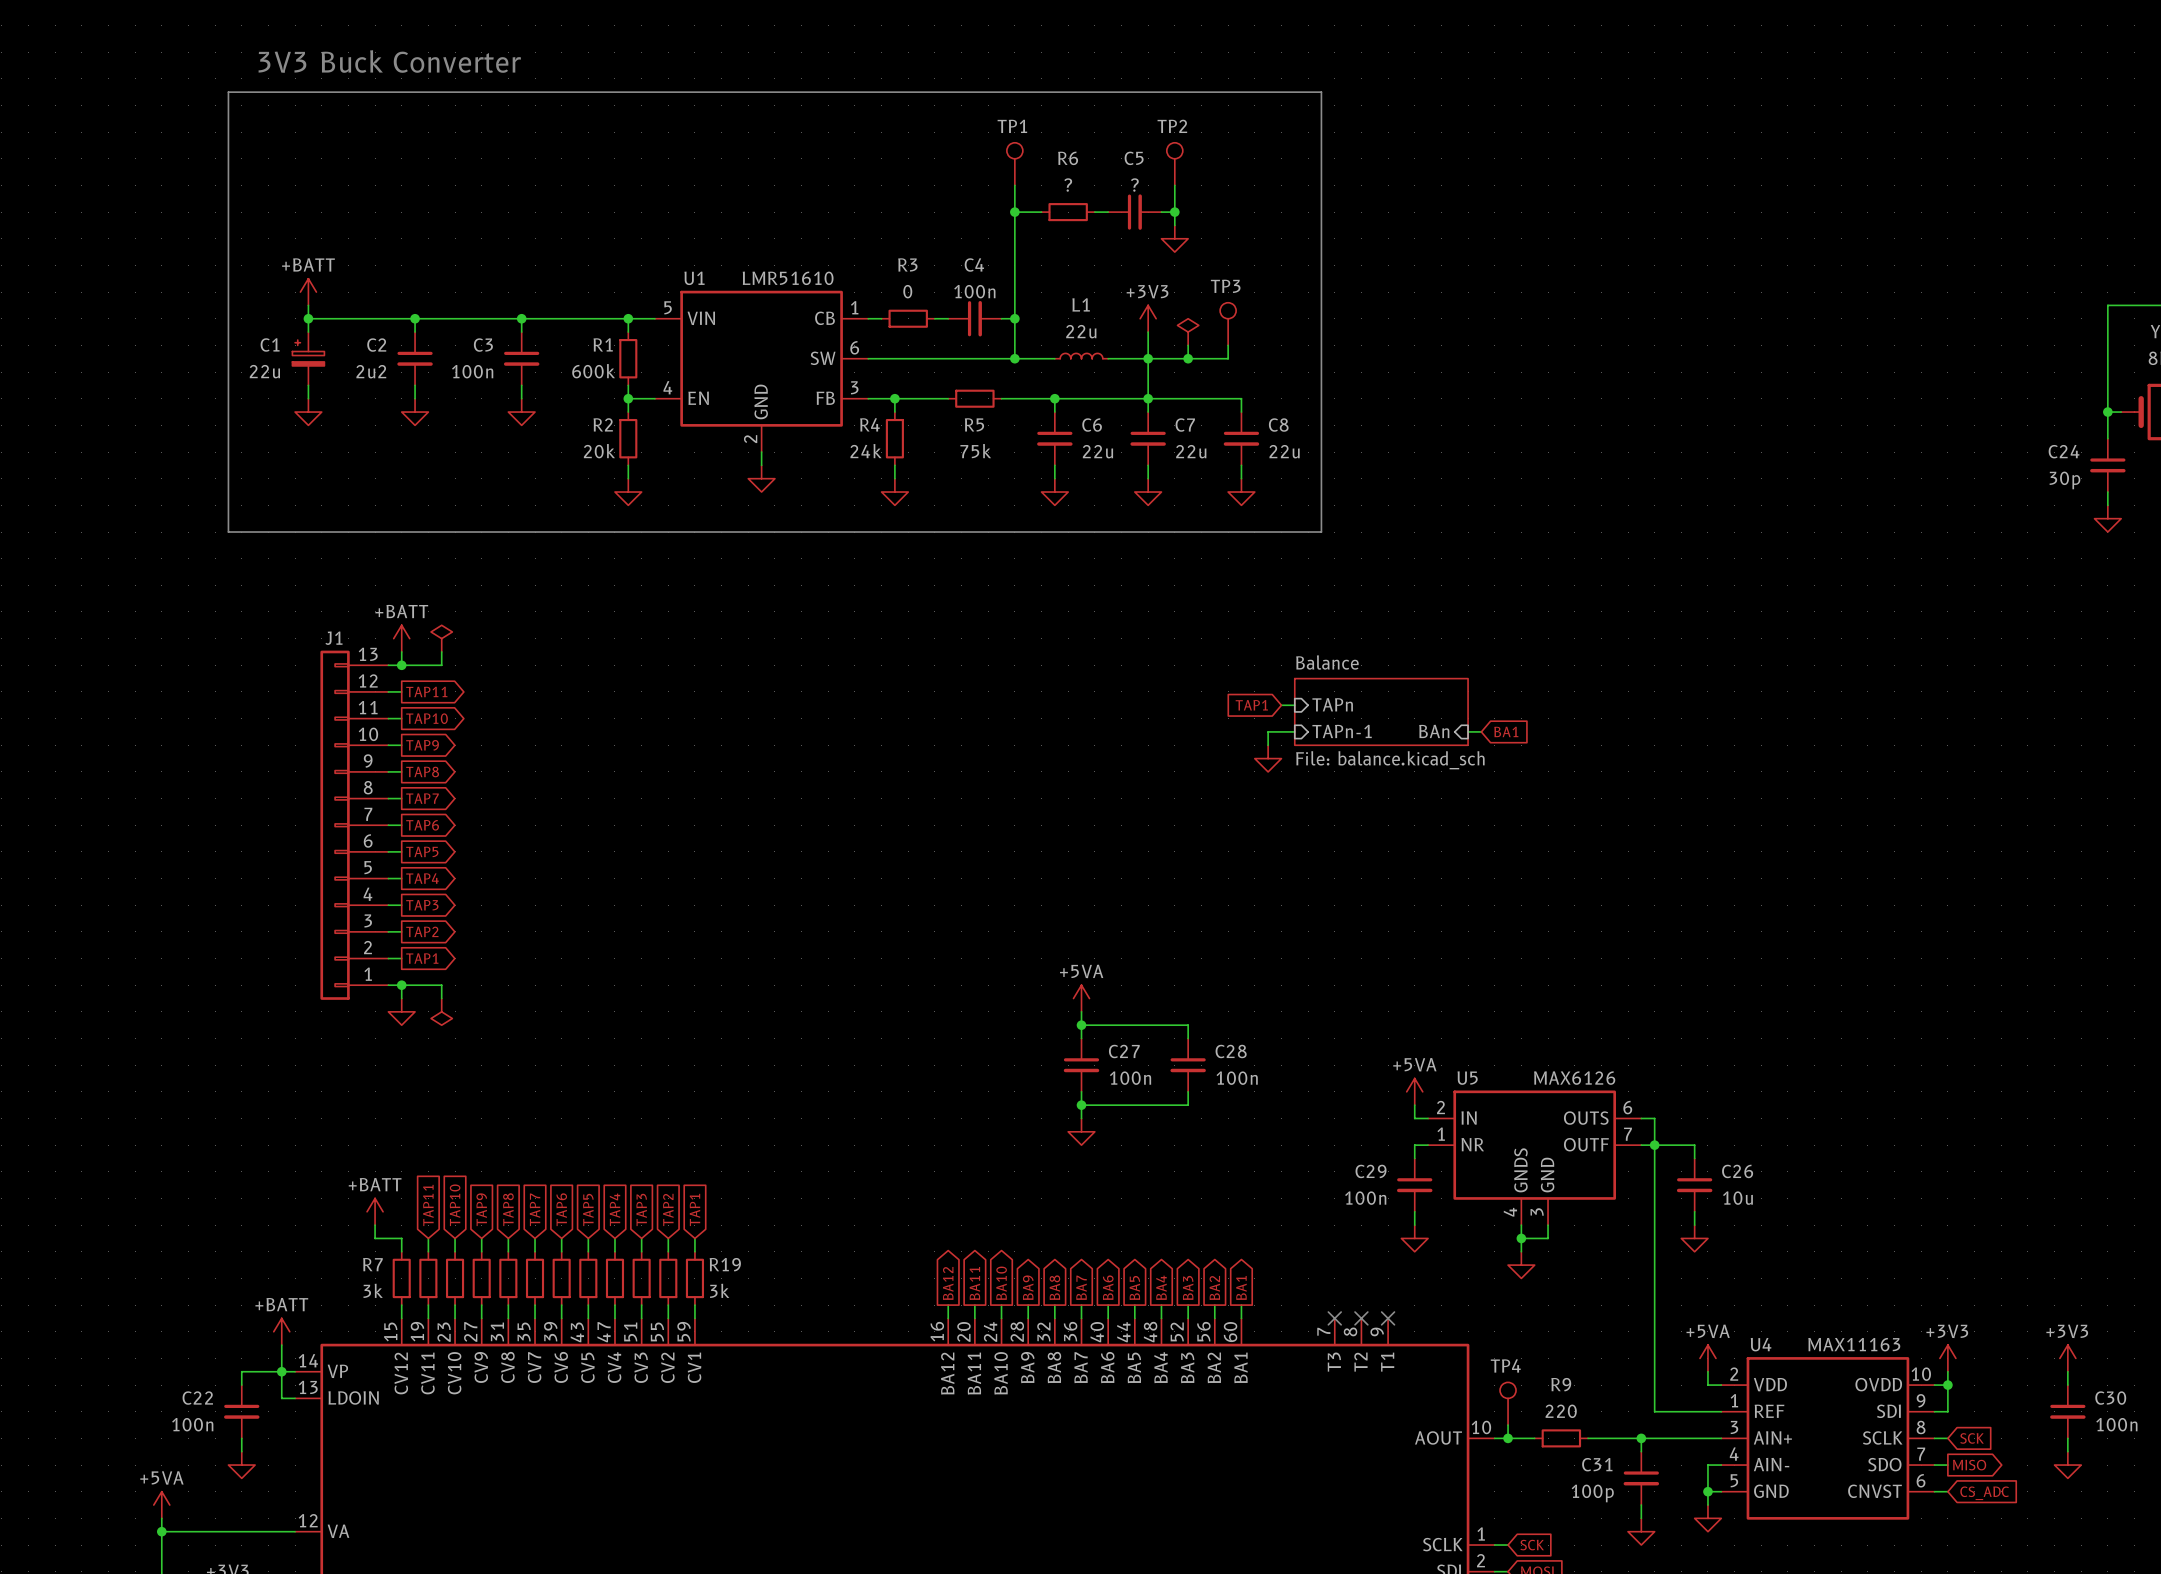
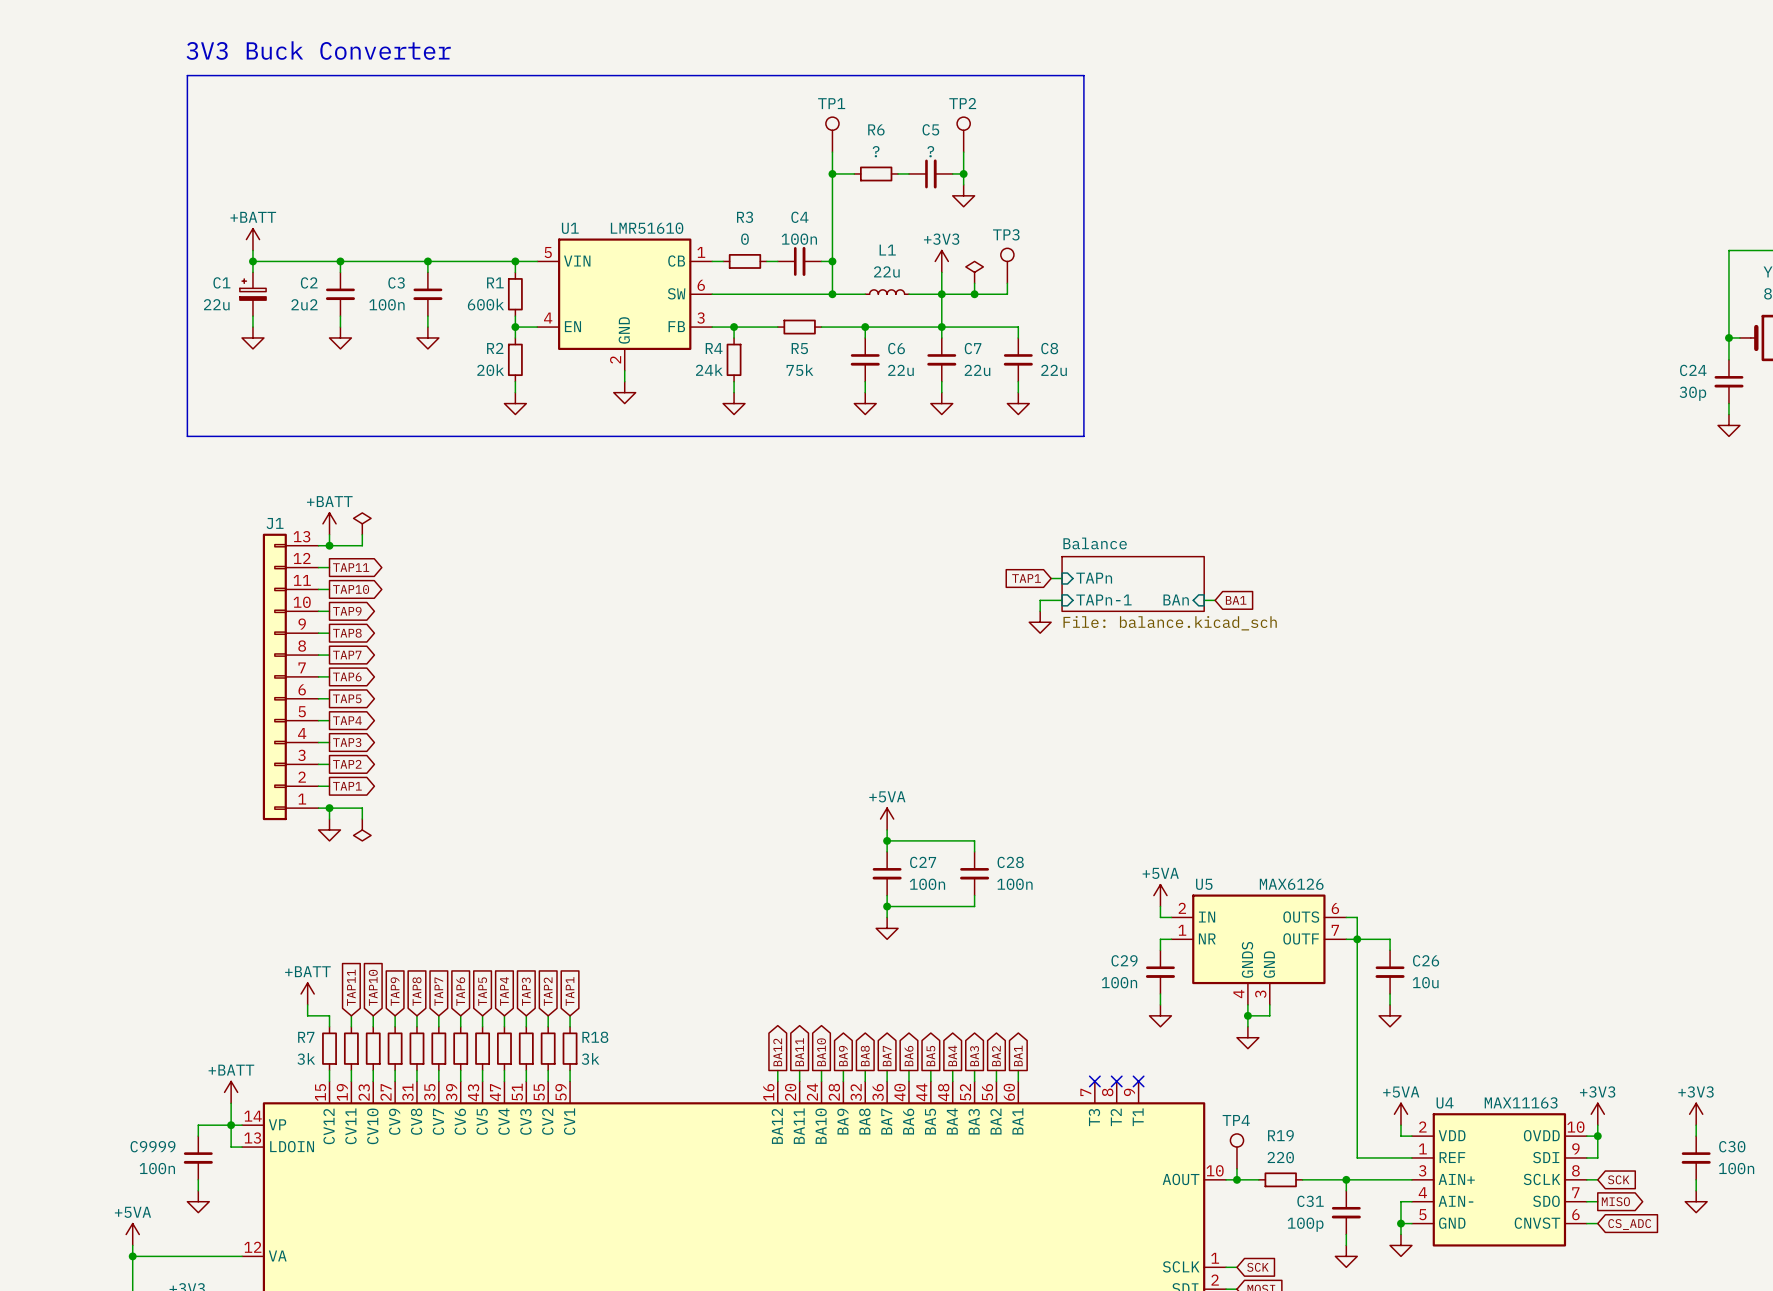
R19 name: R19 (725, 1264) -> R18 (595, 1037)
R9 name: R9 (1561, 1384) -> R19 (1280, 1135)
C22 name: C22 (197, 1398) -> C9999 (152, 1146)

